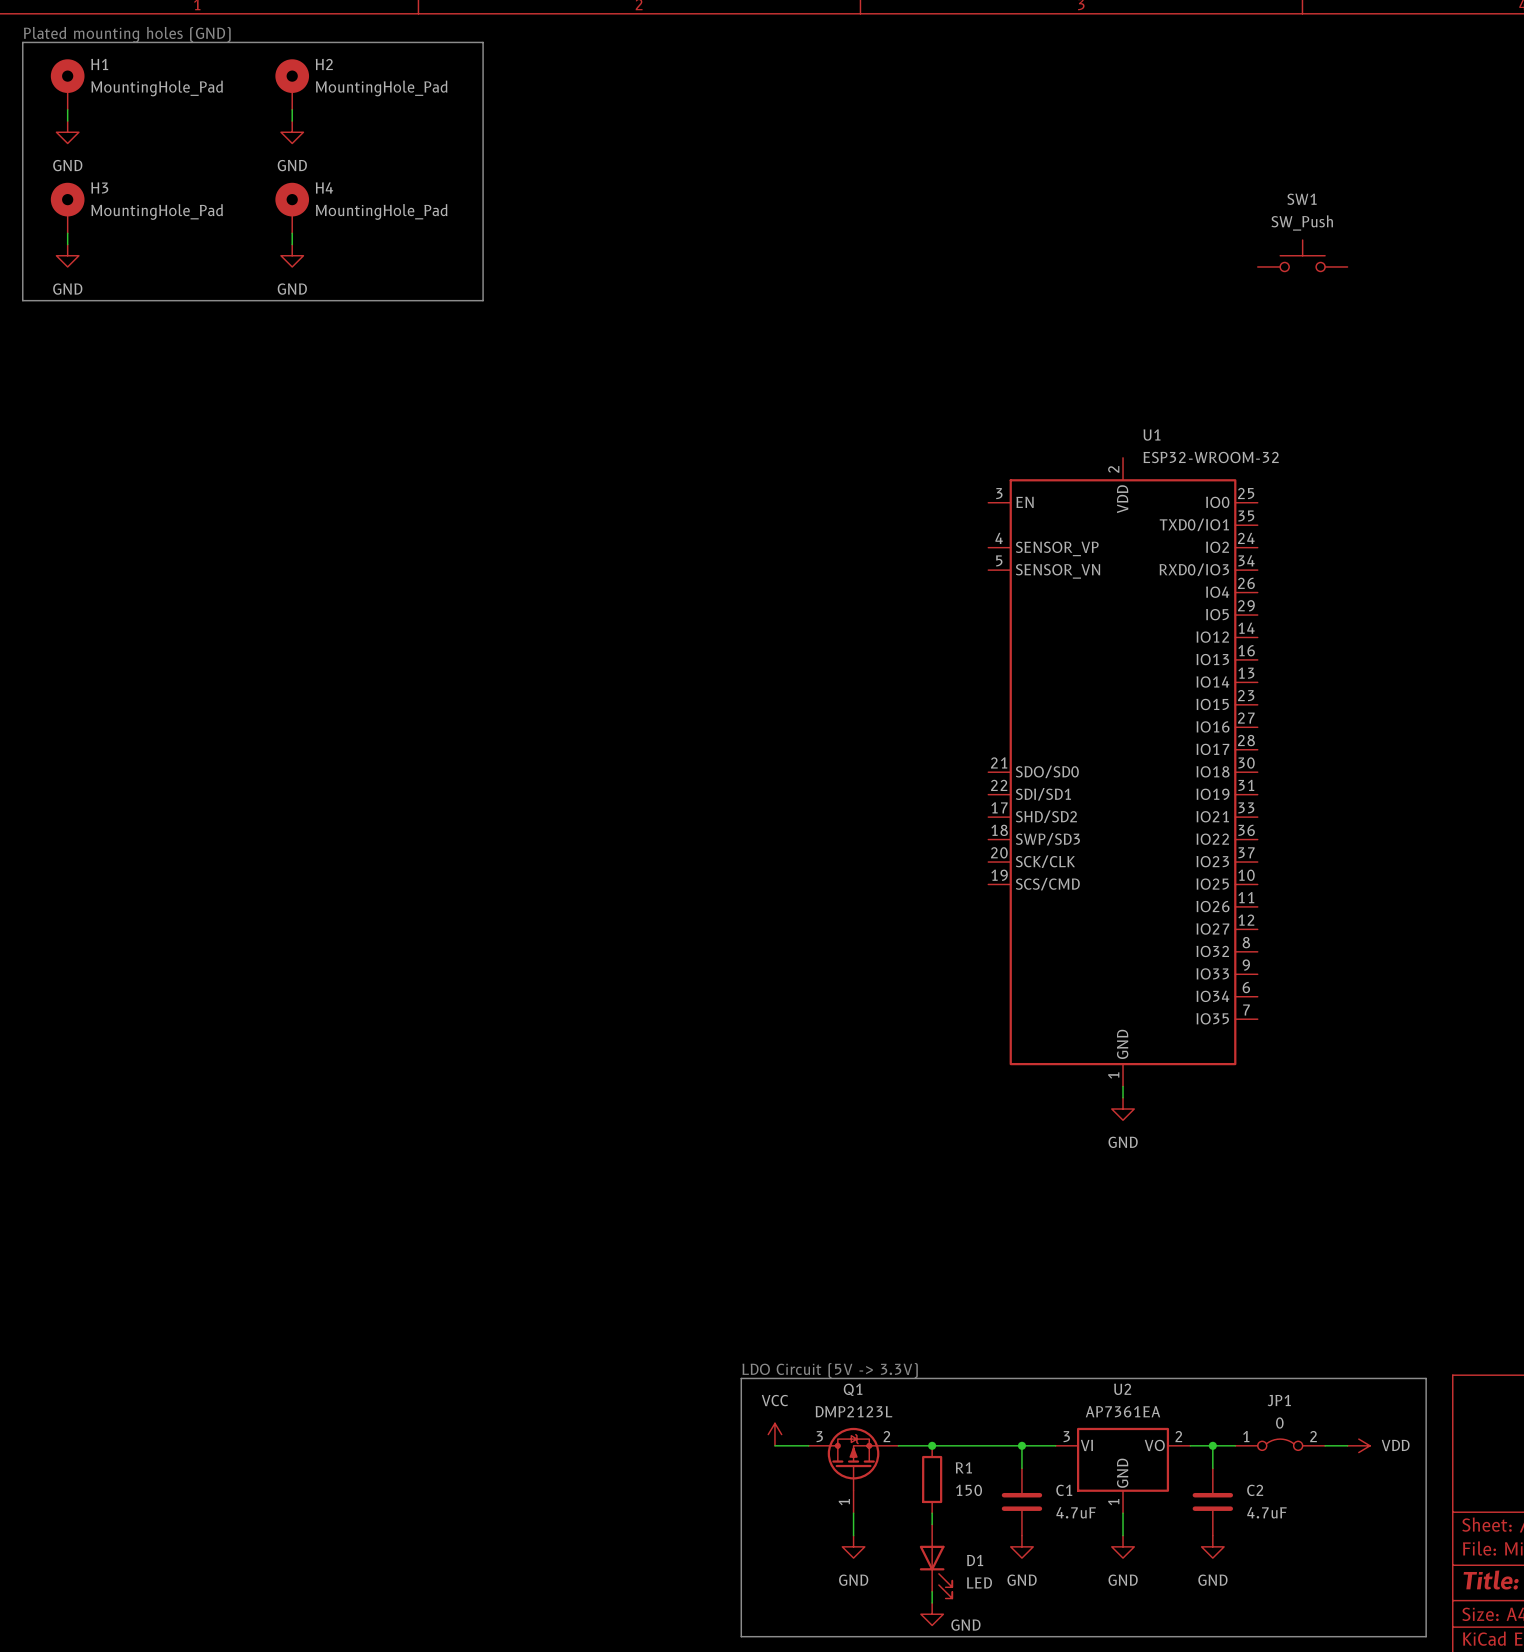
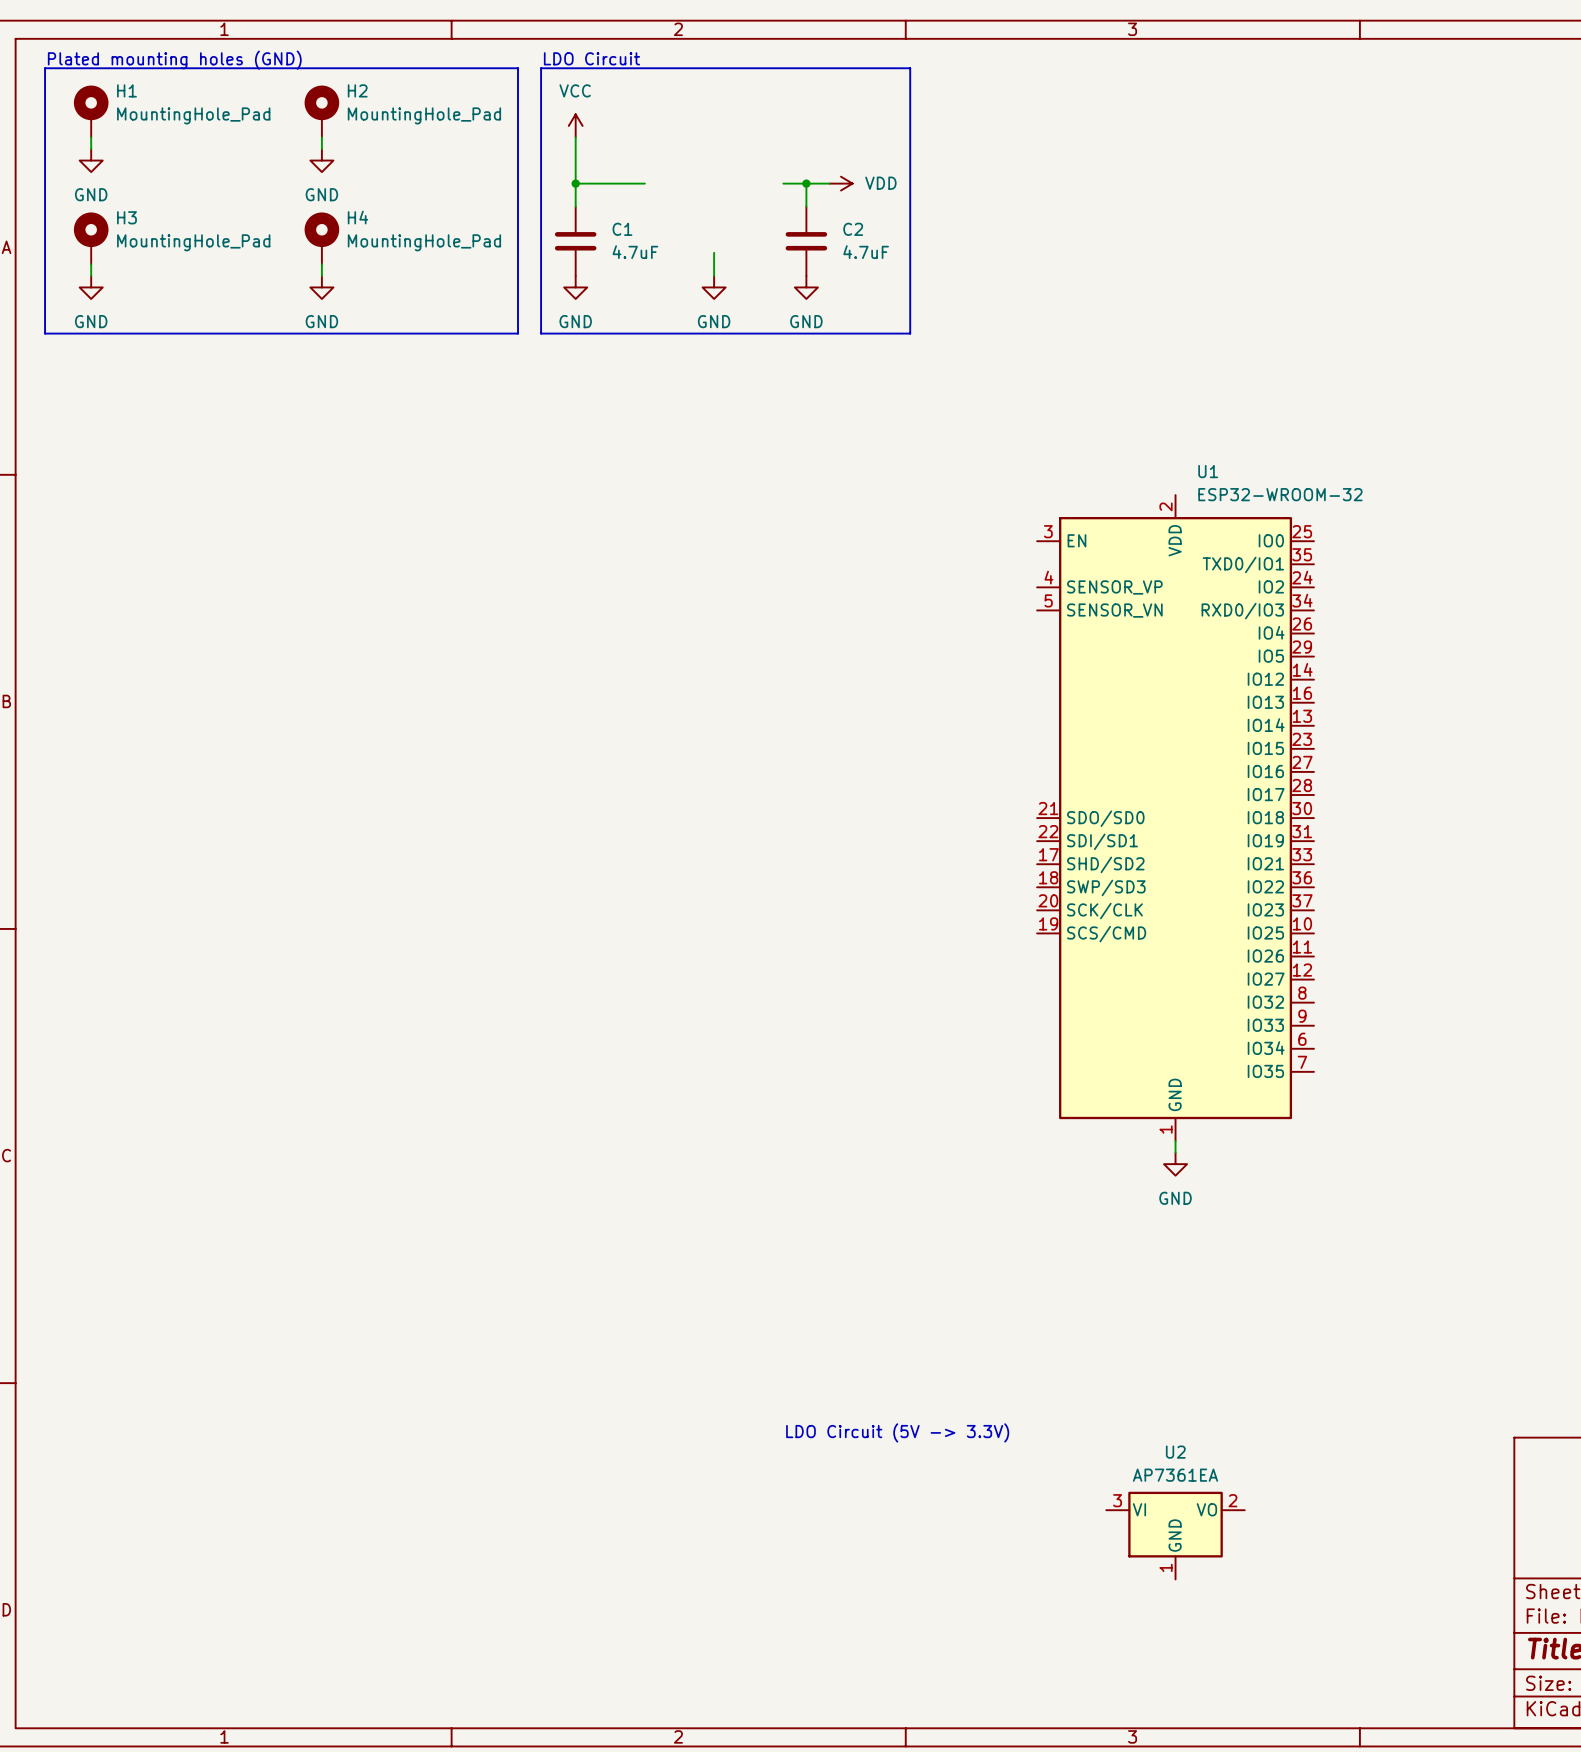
text: none -> LDO Circuit (591, 58)
line: none -> (541, 68) (910, 68) (910, 333) (541, 333) (541, 68)
power symbol: none -> VCC (575, 125)
wire: none -> (575, 137) (575, 206)
wire: none -> (575, 183) (644, 183)
junction: none -> (575, 183)
wire: none -> (783, 183) (829, 183)
wire: none -> (806, 183) (806, 206)
junction: none -> (806, 183)
power symbol: none -> VDD (841, 183)
wire: none -> (714, 252) (714, 275)
power symbol: none -> GND (575, 287)
power symbol: none -> GND (714, 287)
power symbol: none -> GND (806, 287)
SW1: SW_Push (1302, 255) -> none
line: (741, 1378) (1426, 1378) (1426, 1636) (741, 1636) (741, 1378) -> none
power symbol: VCC (774, 1434) -> none
JP1: 0 (1280, 1444) -> none
wire: (774, 1445) (808, 1445) -> none
wire: (898, 1445) (1055, 1445) -> none
junction: (932, 1445) -> none
wire: (1021, 1445) (1021, 1468) -> none
junction: (1021, 1445) -> none
wire: (1190, 1445) (1235, 1445) -> none
wire: (1212, 1445) (1212, 1468) -> none
junction: (1212, 1445) -> none
wire: (1325, 1445) (1347, 1445) -> none
power symbol: VDD (1358, 1445) -> none
Q1: DMP2123L (853, 1470) -> none
R1: 150 (932, 1479) -> none
C1 position: (1021, 1501) -> (575, 241)
C2 position: (1212, 1501) -> (806, 241)
wire: (853, 1513) (853, 1535) -> none
wire: (932, 1513) (932, 1524) -> none
wire: (1123, 1513) (1123, 1535) -> none
power symbol: GND (853, 1546) -> none
power symbol: GND (1021, 1546) -> none
power symbol: GND (1123, 1546) -> none
power symbol: GND (1212, 1546) -> none
D1: LED (936, 1561) -> none
wire: (932, 1591) (932, 1603) -> none
power symbol: GND (932, 1614) -> none

